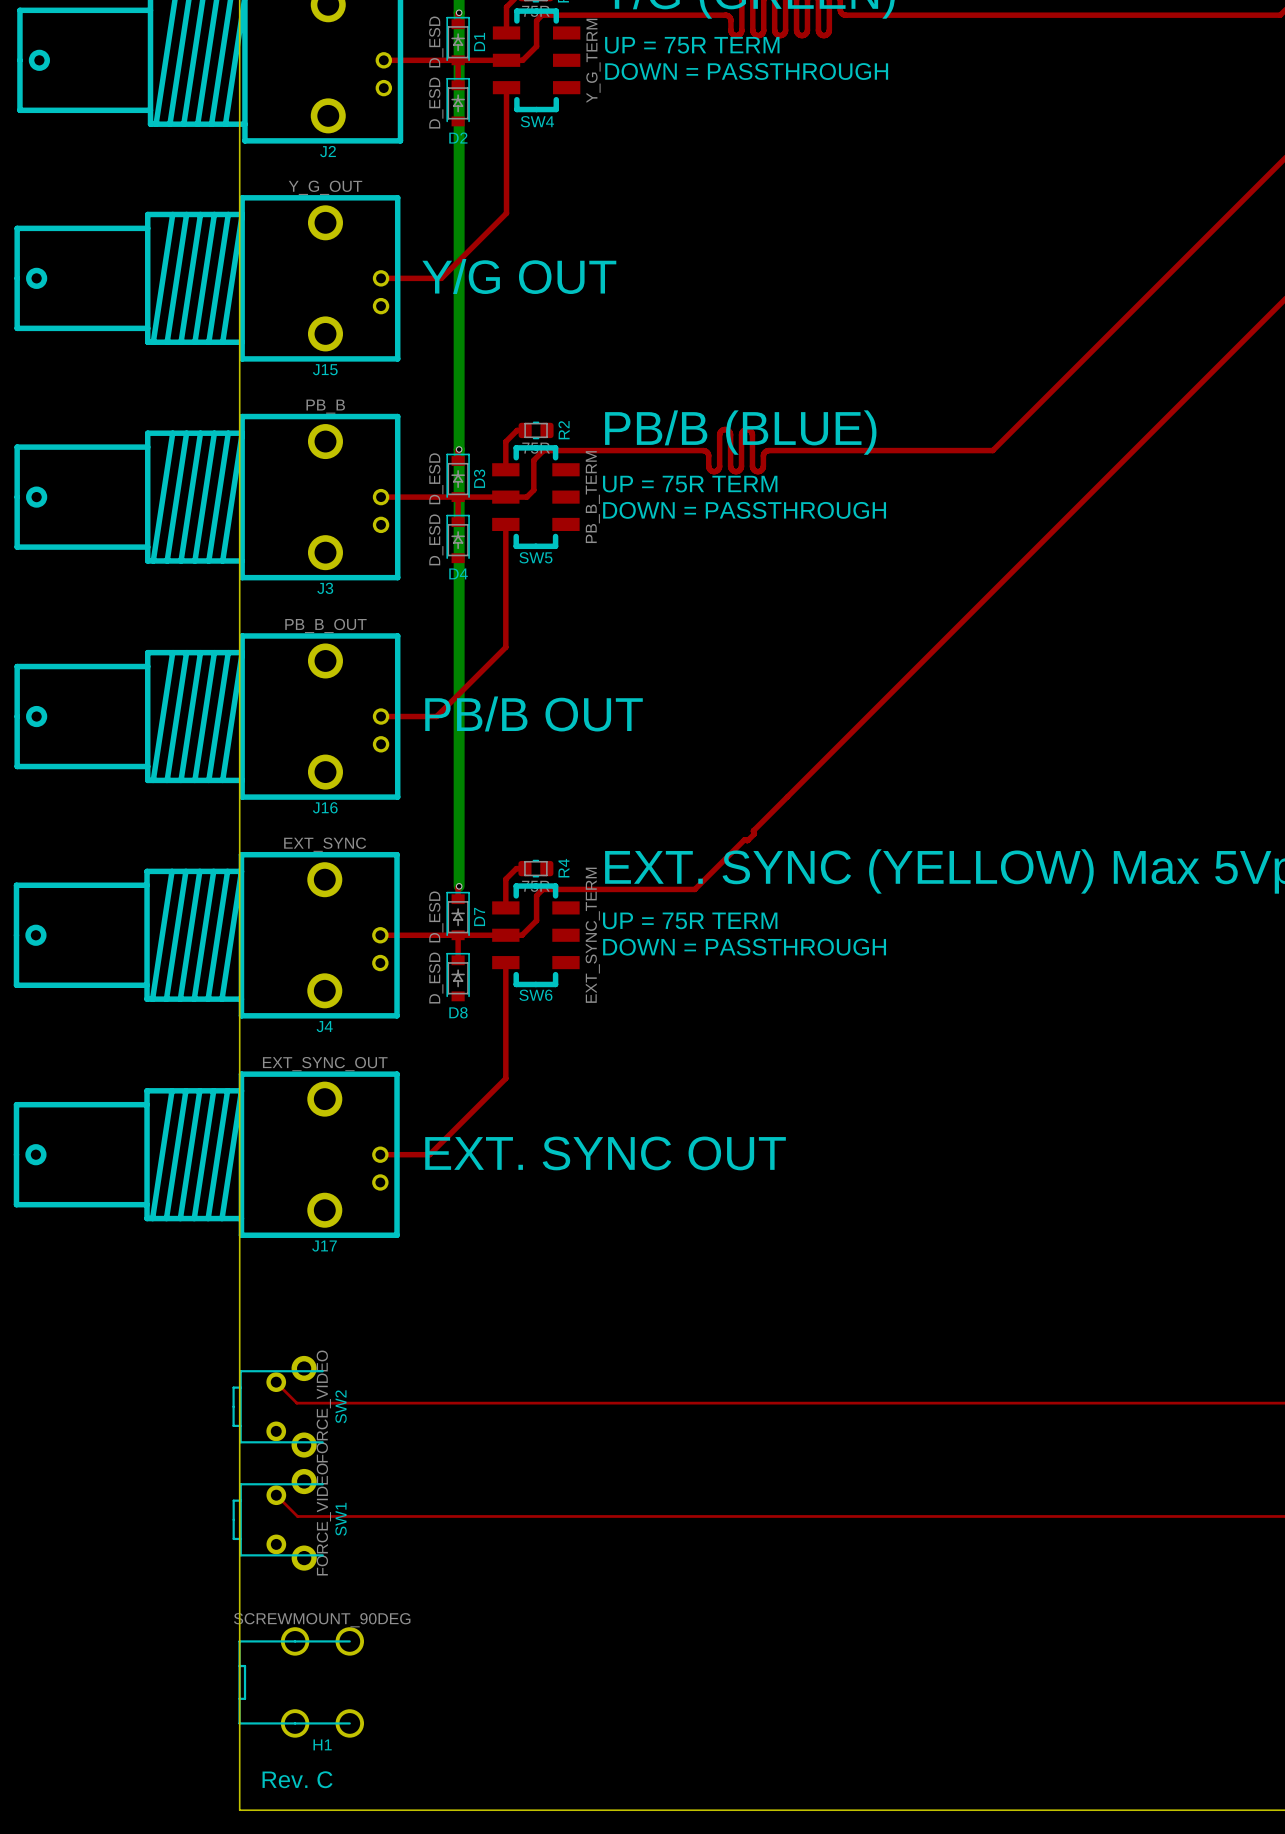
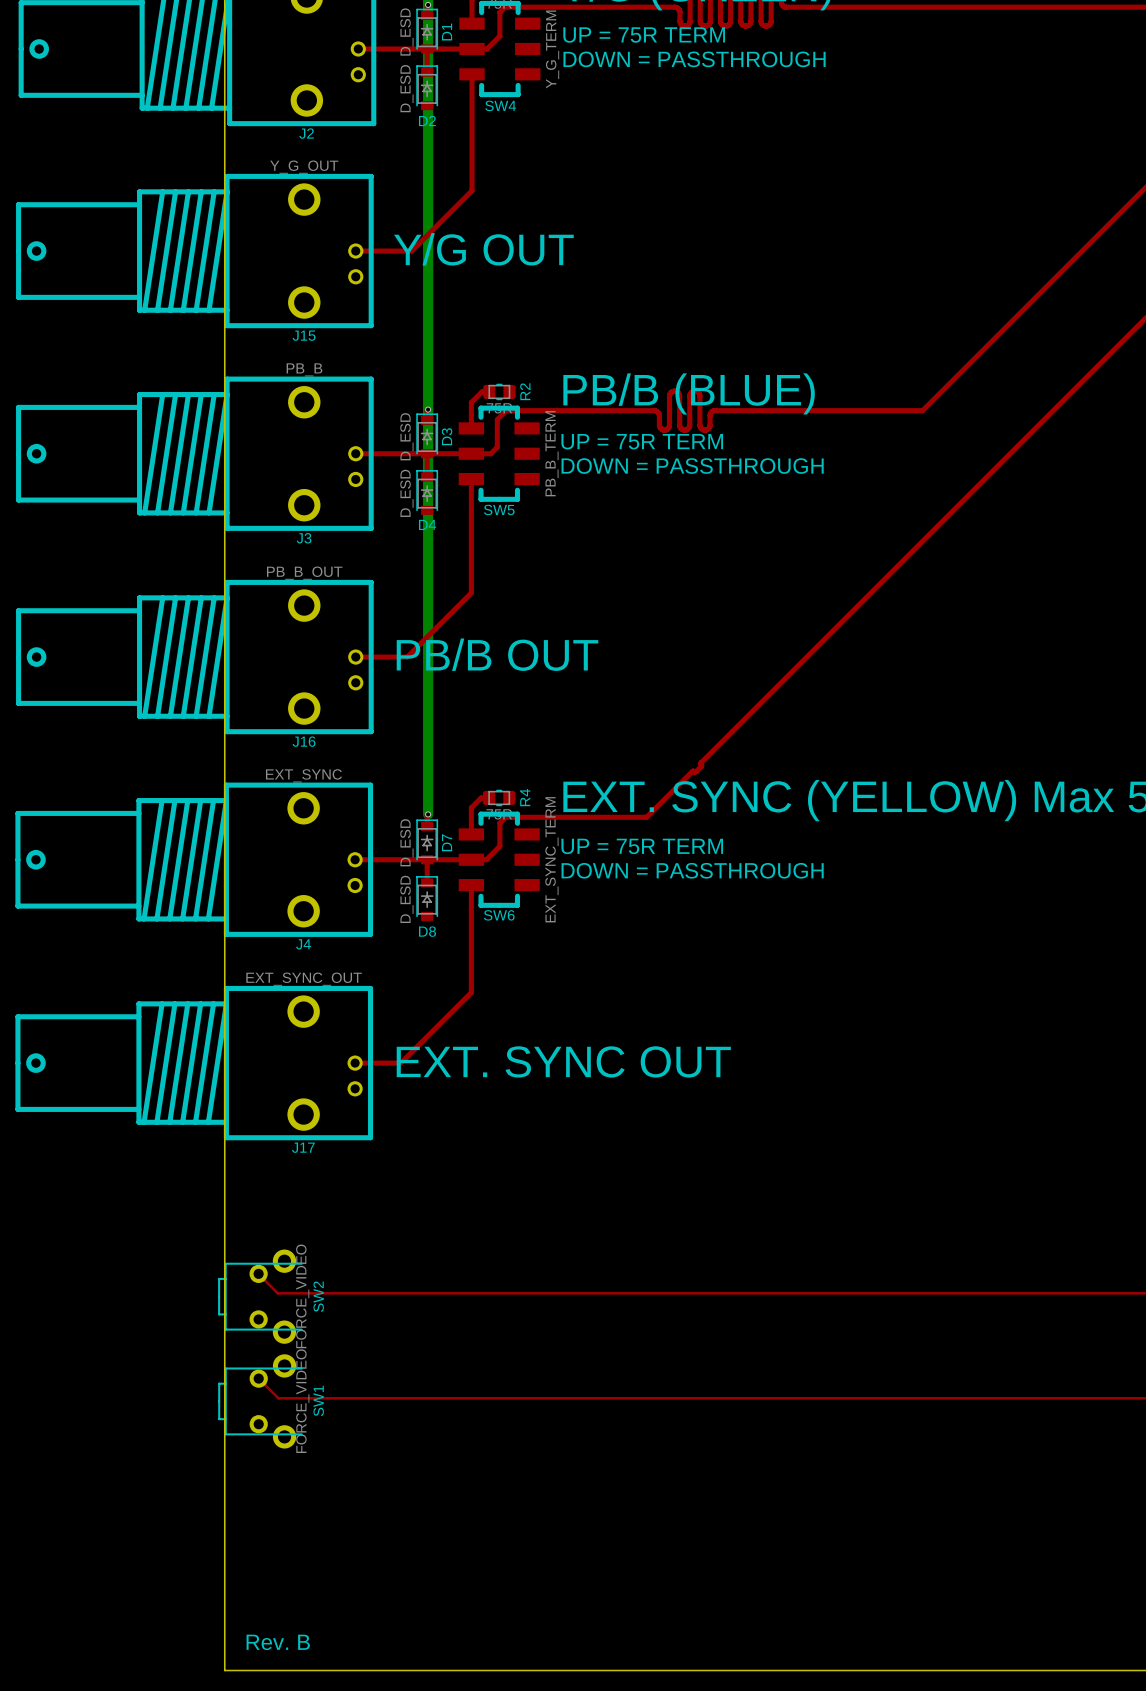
H1: SCREWMOUNT_90DEG (301, 1682) -> none
text: Rev. C (297, 1779) -> Rev. B (278, 1642)

